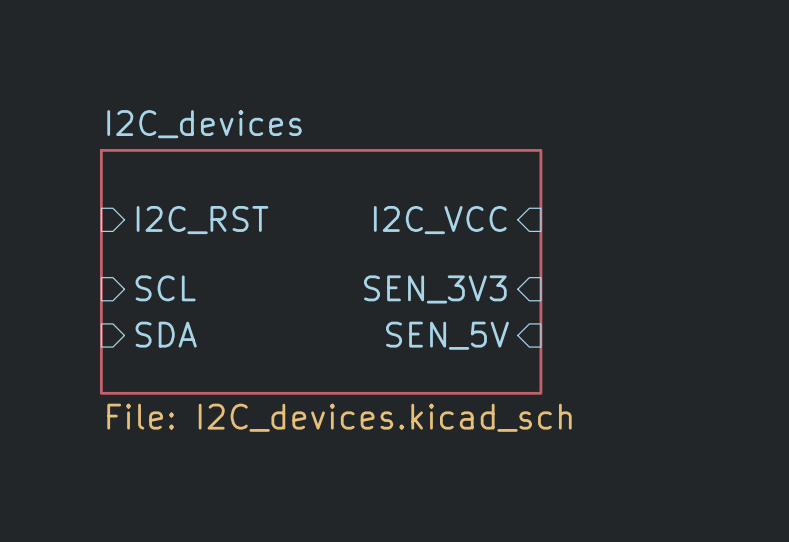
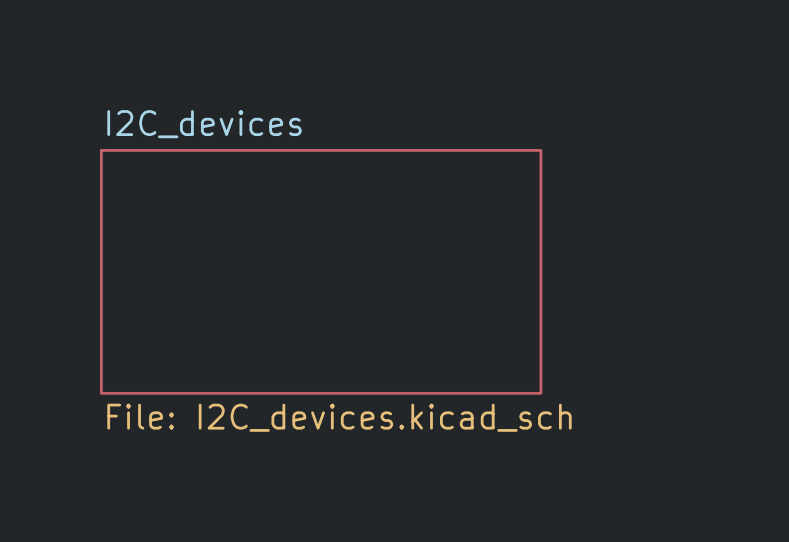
sheet pin: I2C_RST (202, 220) -> none
sheet pin: I2C_VCC (440, 220) -> none
sheet pin: SCL (165, 288) -> none
sheet pin: SEN_3V3 (435, 289) -> none
sheet pin: SDA (166, 334) -> none
sheet pin: SEN_5V (447, 335) -> none

